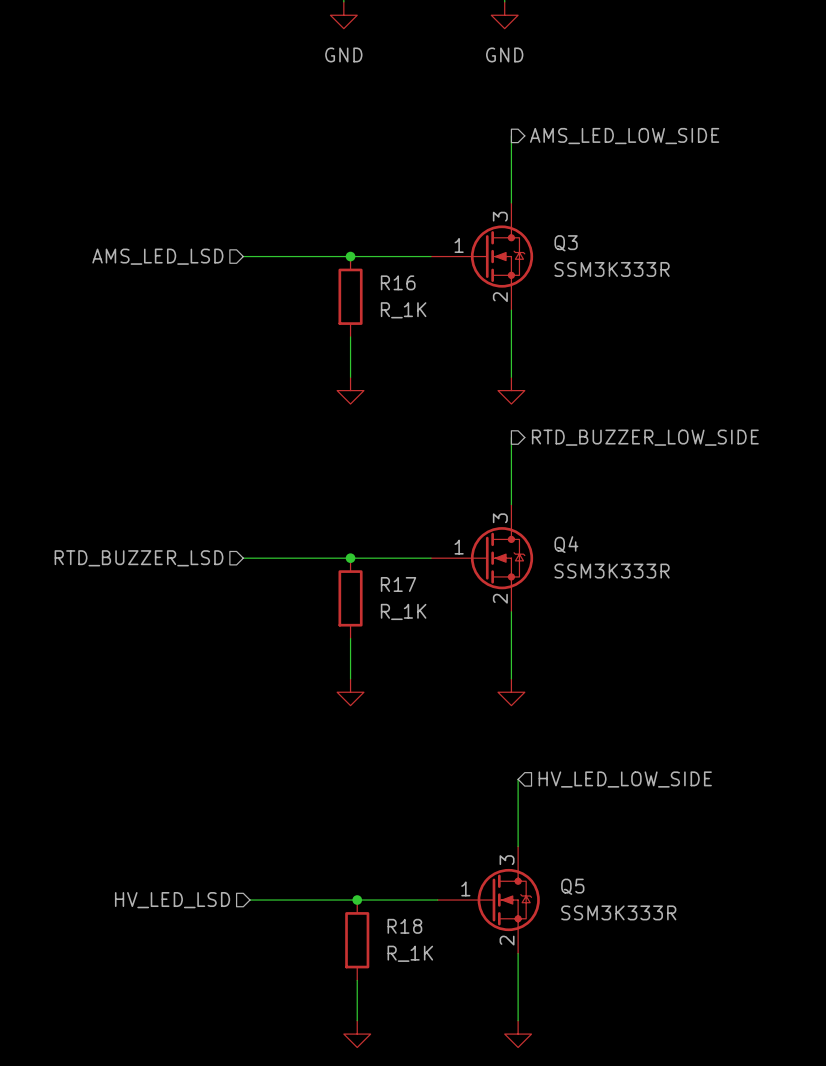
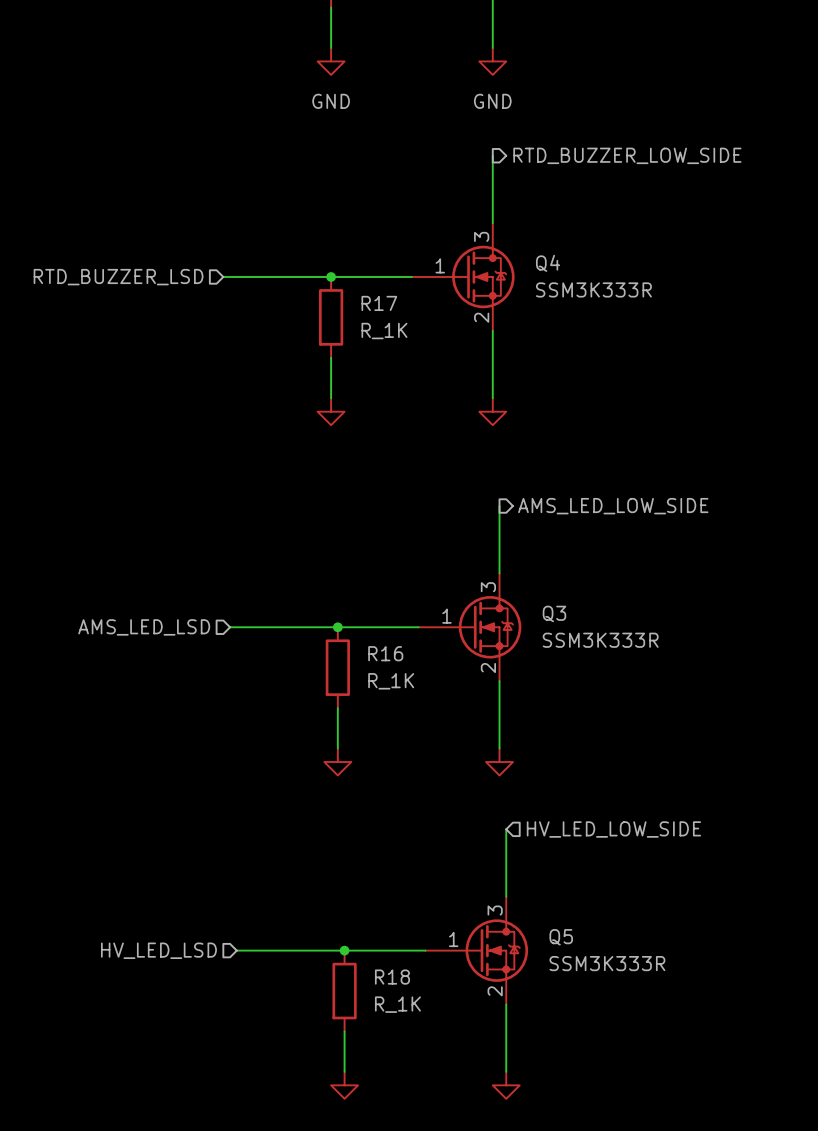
wire: (511, 135) (511, 202) -> (492, 155) (492, 223)
hierarchical label: AMS_LED_LOW_SIDE (624, 136) -> RTD_BUZZER_LOW_SIDE (627, 155)
hierarchical label: none -> RTD_BUZZER_LSD (118, 277)
hierarchical label: AMS_LED_LSD (157, 256) -> none
wire: (243, 256) (430, 256) -> (223, 276) (411, 276)
junction position: (350, 256) -> (331, 276)
Q3 position: (482, 256) -> (470, 627)
R16 position: (350, 296) -> (337, 667)
wire: (511, 310) (511, 377) -> (492, 330) (492, 398)
wire: (350, 336) (350, 377) -> (331, 357) (331, 398)
power symbol position: (350, 390) -> (331, 411)
power symbol position: (511, 390) -> (492, 411)
hierarchical label: RTD_BUZZER_LOW_SIDE (645, 437) -> none
hierarchical label: none -> AMS_LED_LOW_SIDE (613, 506)
hierarchical label: RTD_BUZZER_LSD (139, 558) -> none
wire: (243, 558) (430, 558) -> (230, 627) (418, 627)
junction position: (350, 558) -> (337, 627)
Q4 position: (482, 558) -> (463, 276)
hierarchical label: none -> AMS_LED_LSD (144, 627)
R17 position: (350, 598) -> (331, 317)
power symbol position: (350, 692) -> (337, 762)
power symbol position: (511, 692) -> (499, 762)

